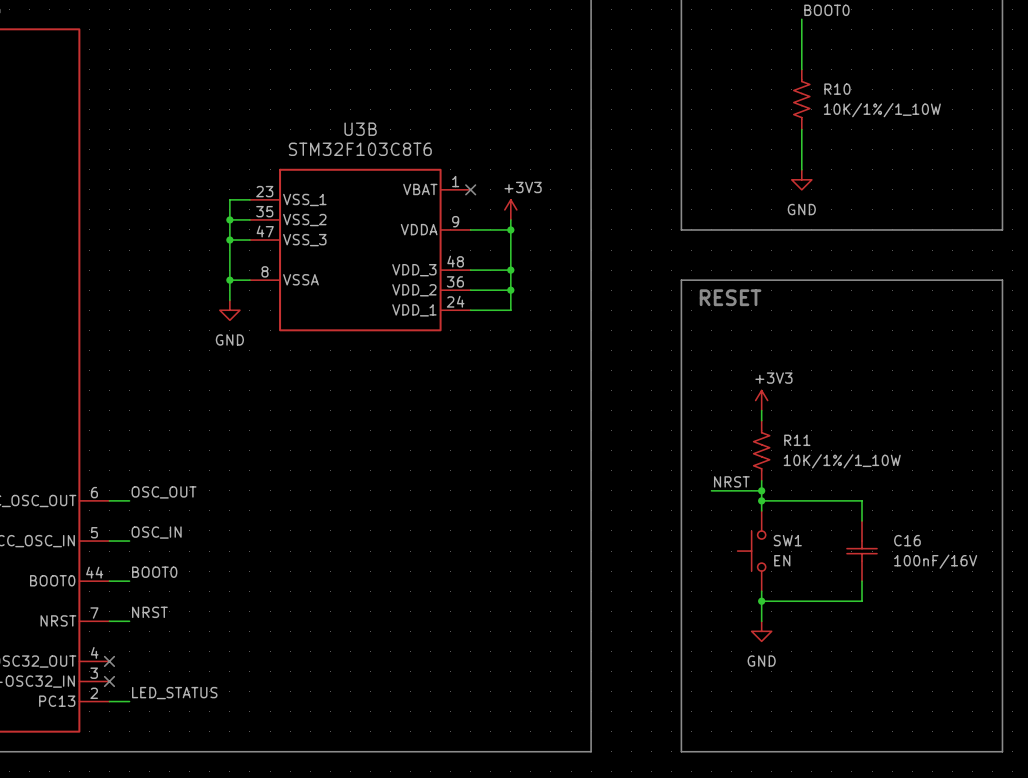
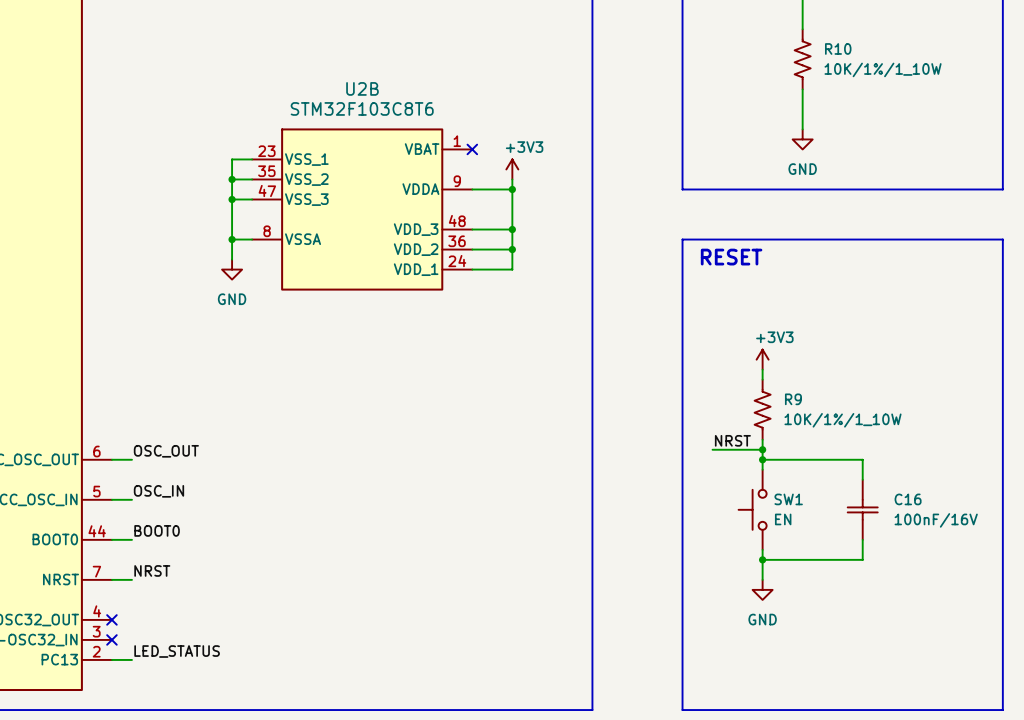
U3B name: U3B (360, 129) -> U2B (362, 88)
R11 name: R11 (797, 440) -> R9 (793, 399)

